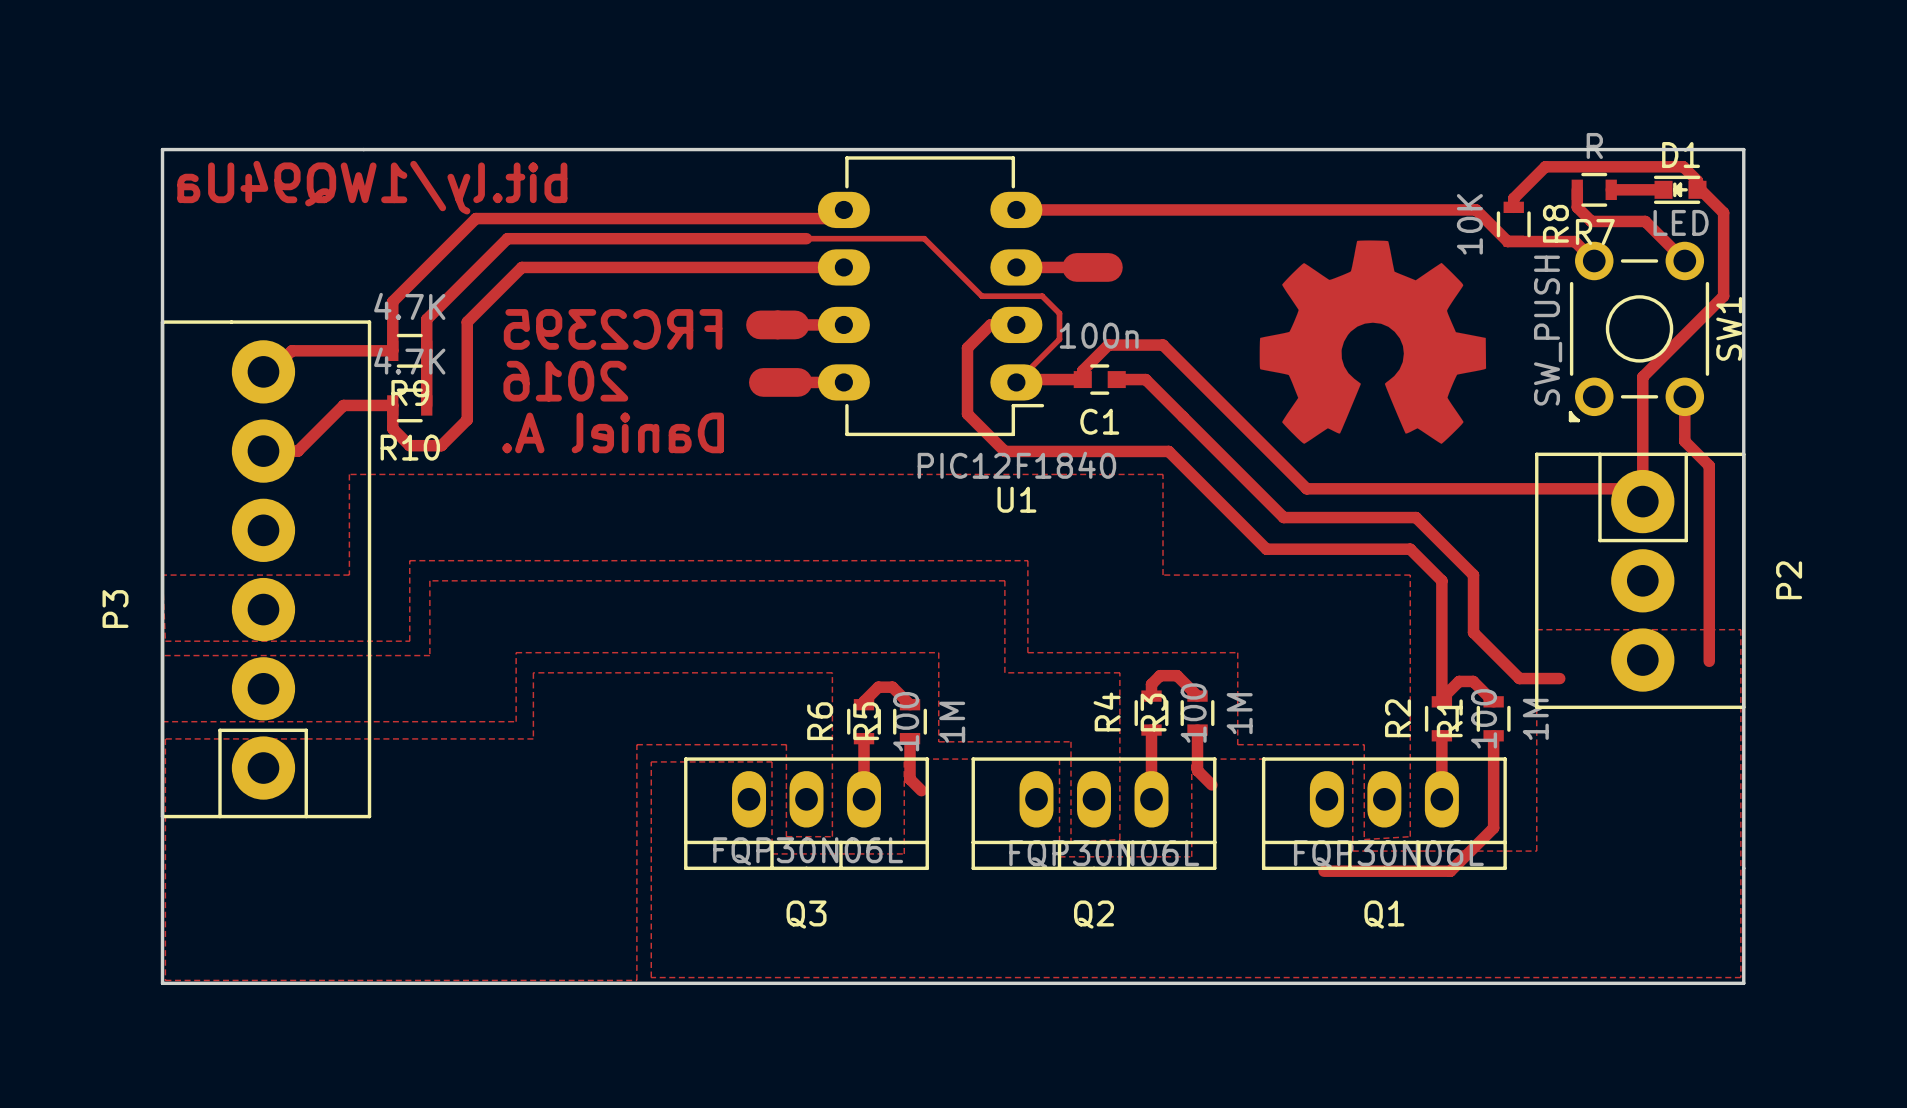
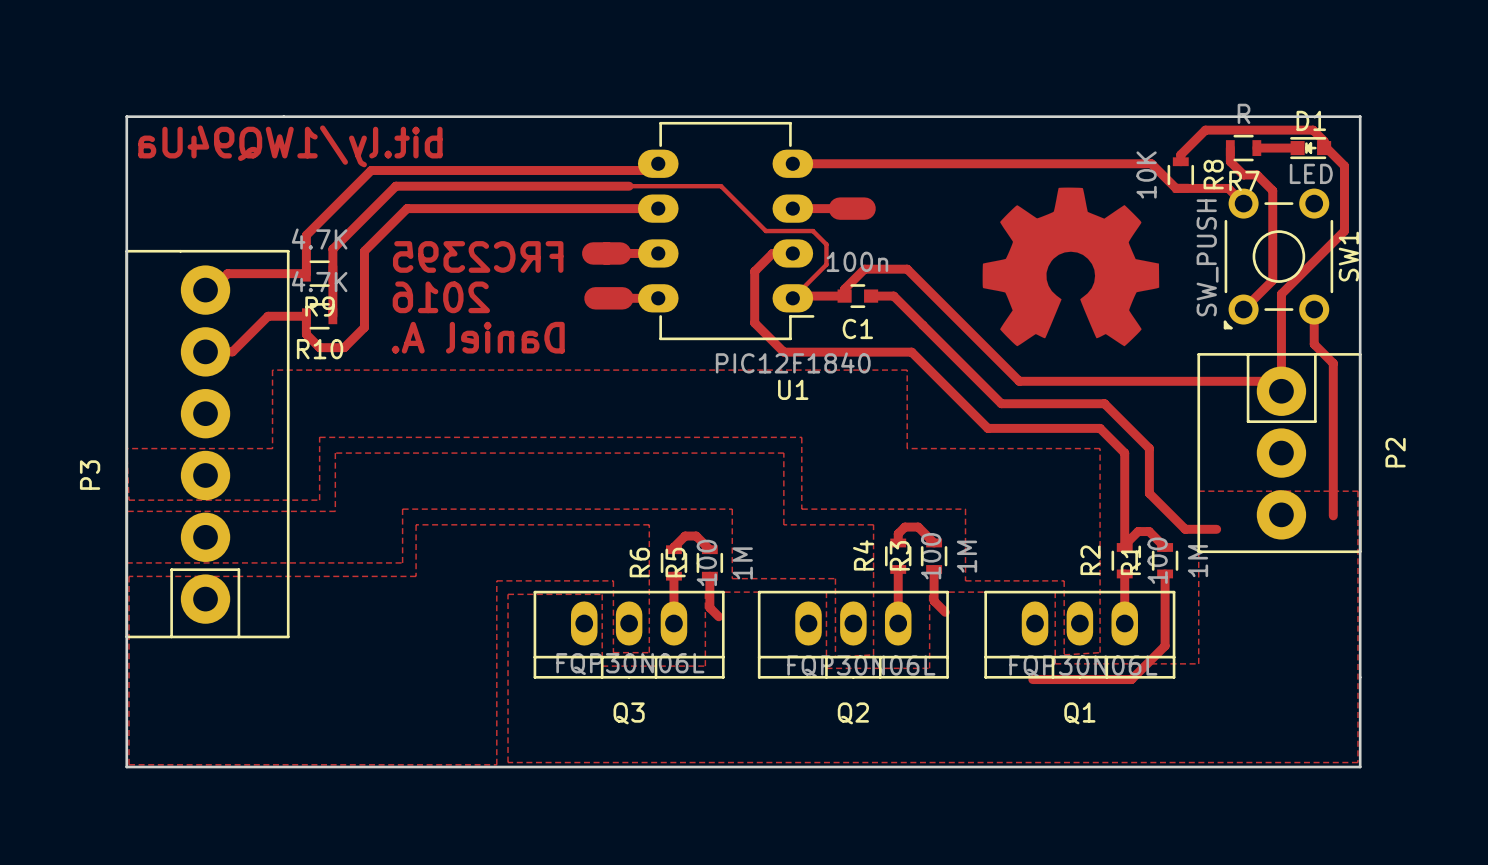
top track: (1591, 221) (1645, 221) (1684, 260) -> (1241, 172) (1243, 174) (1257, 174) (1272, 190) (1272, 280) (1243, 309)

